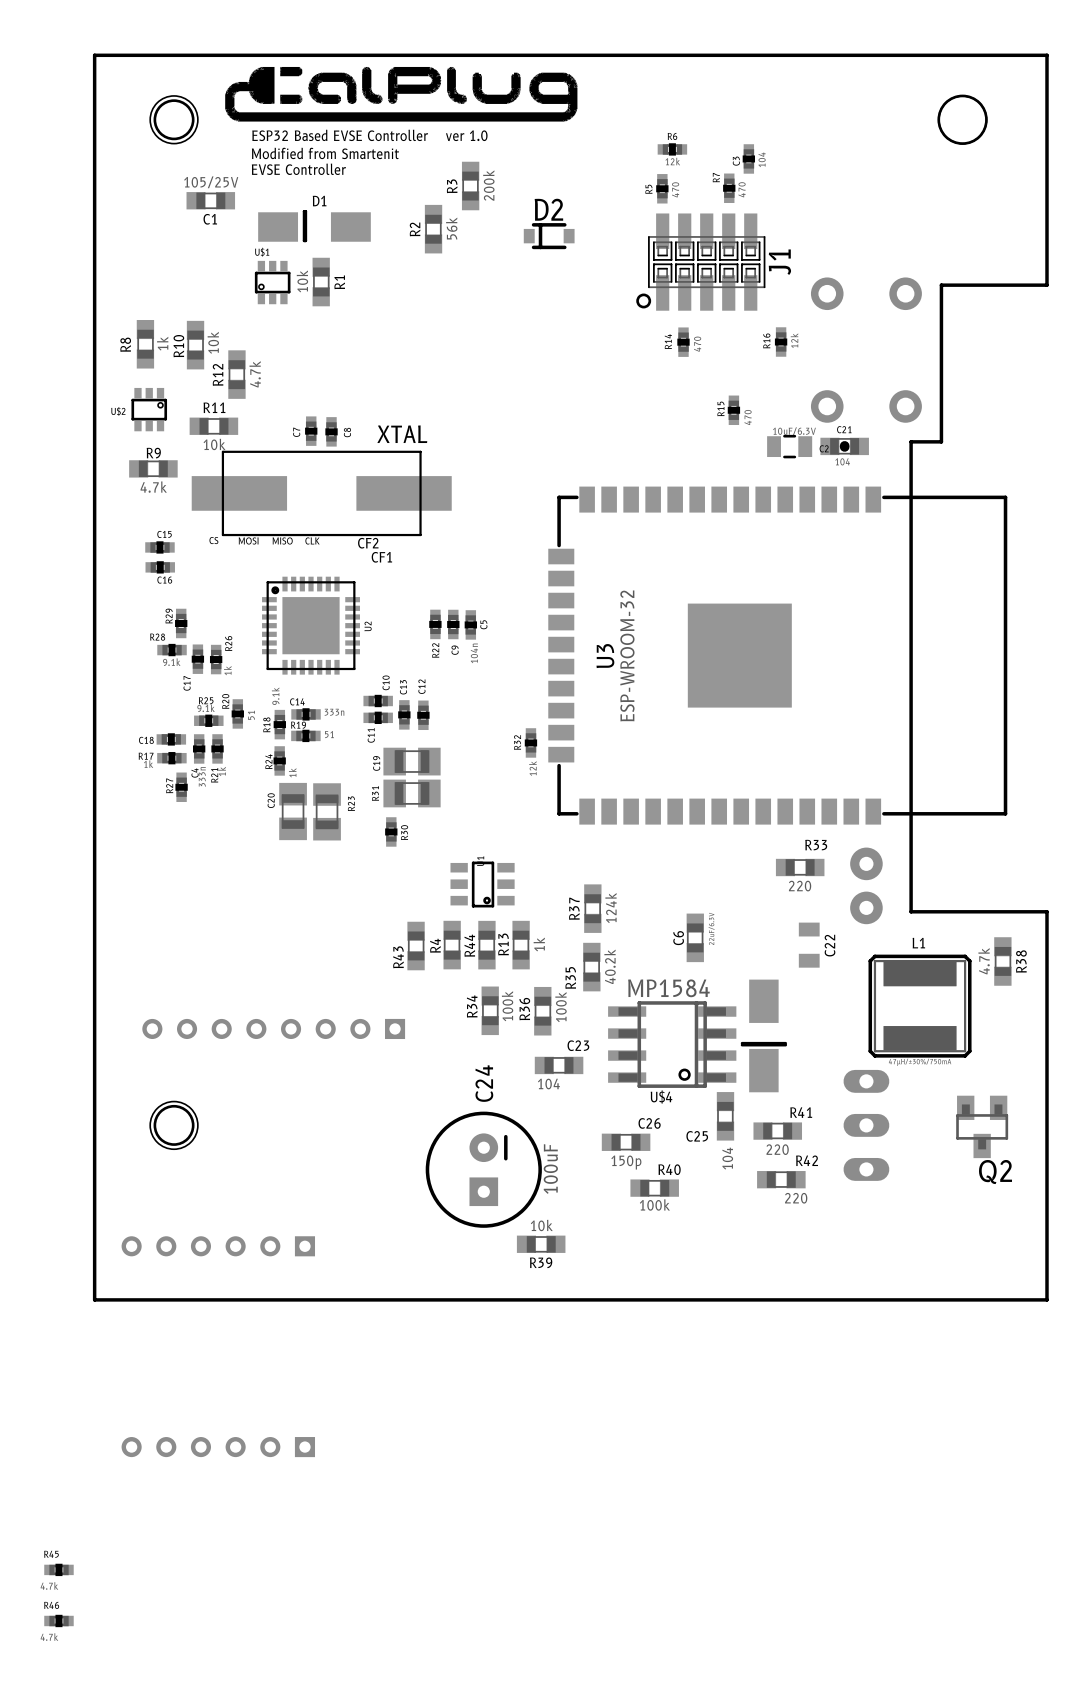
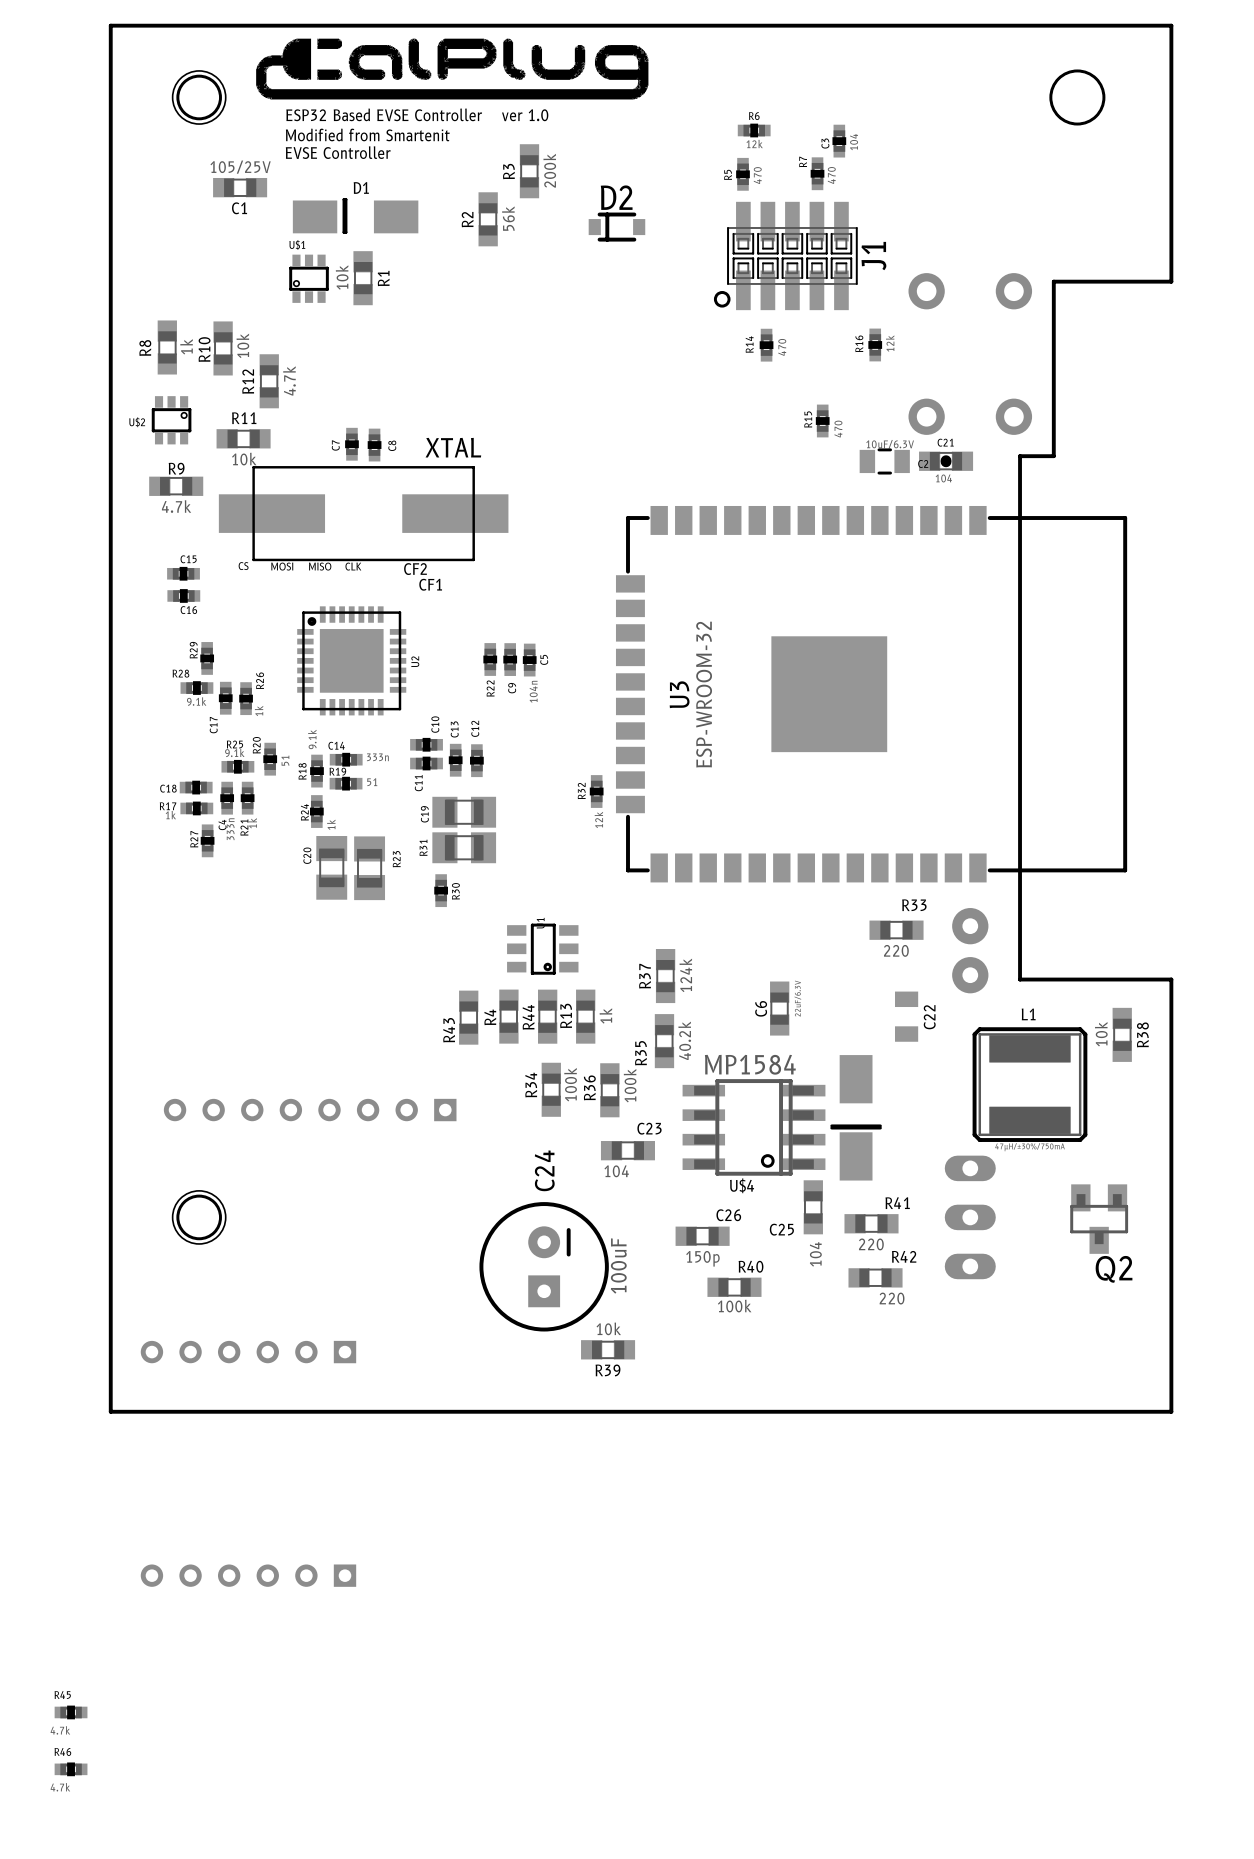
R38 value: 4.7k (984, 961) -> 10k (1101, 1034)

